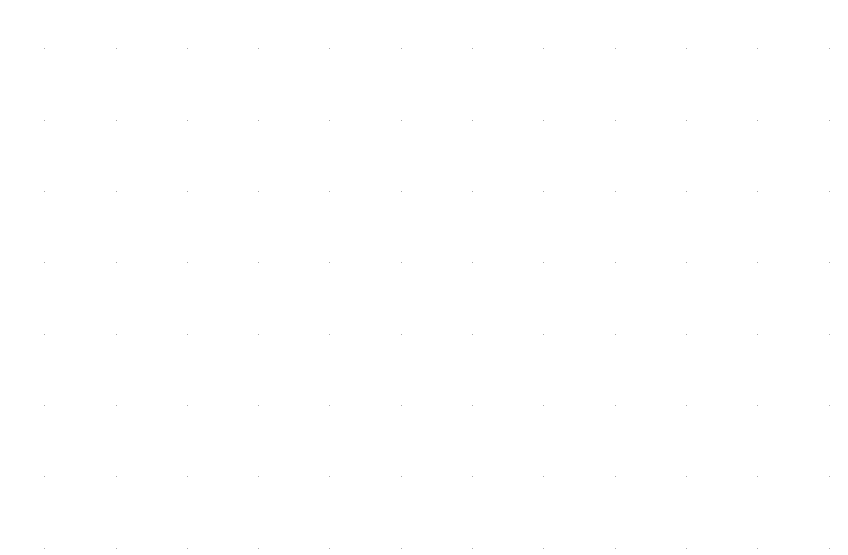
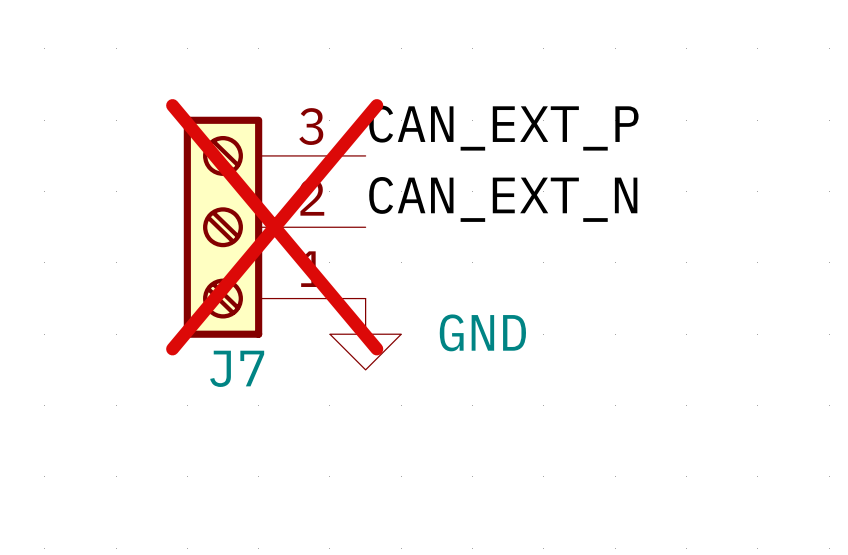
label: none -> CAN_EXT_P (503, 128)
label: none -> CAN_EXT_N (503, 199)
J7: none -> (274, 227)
power symbol: none -> GND (365, 334)

